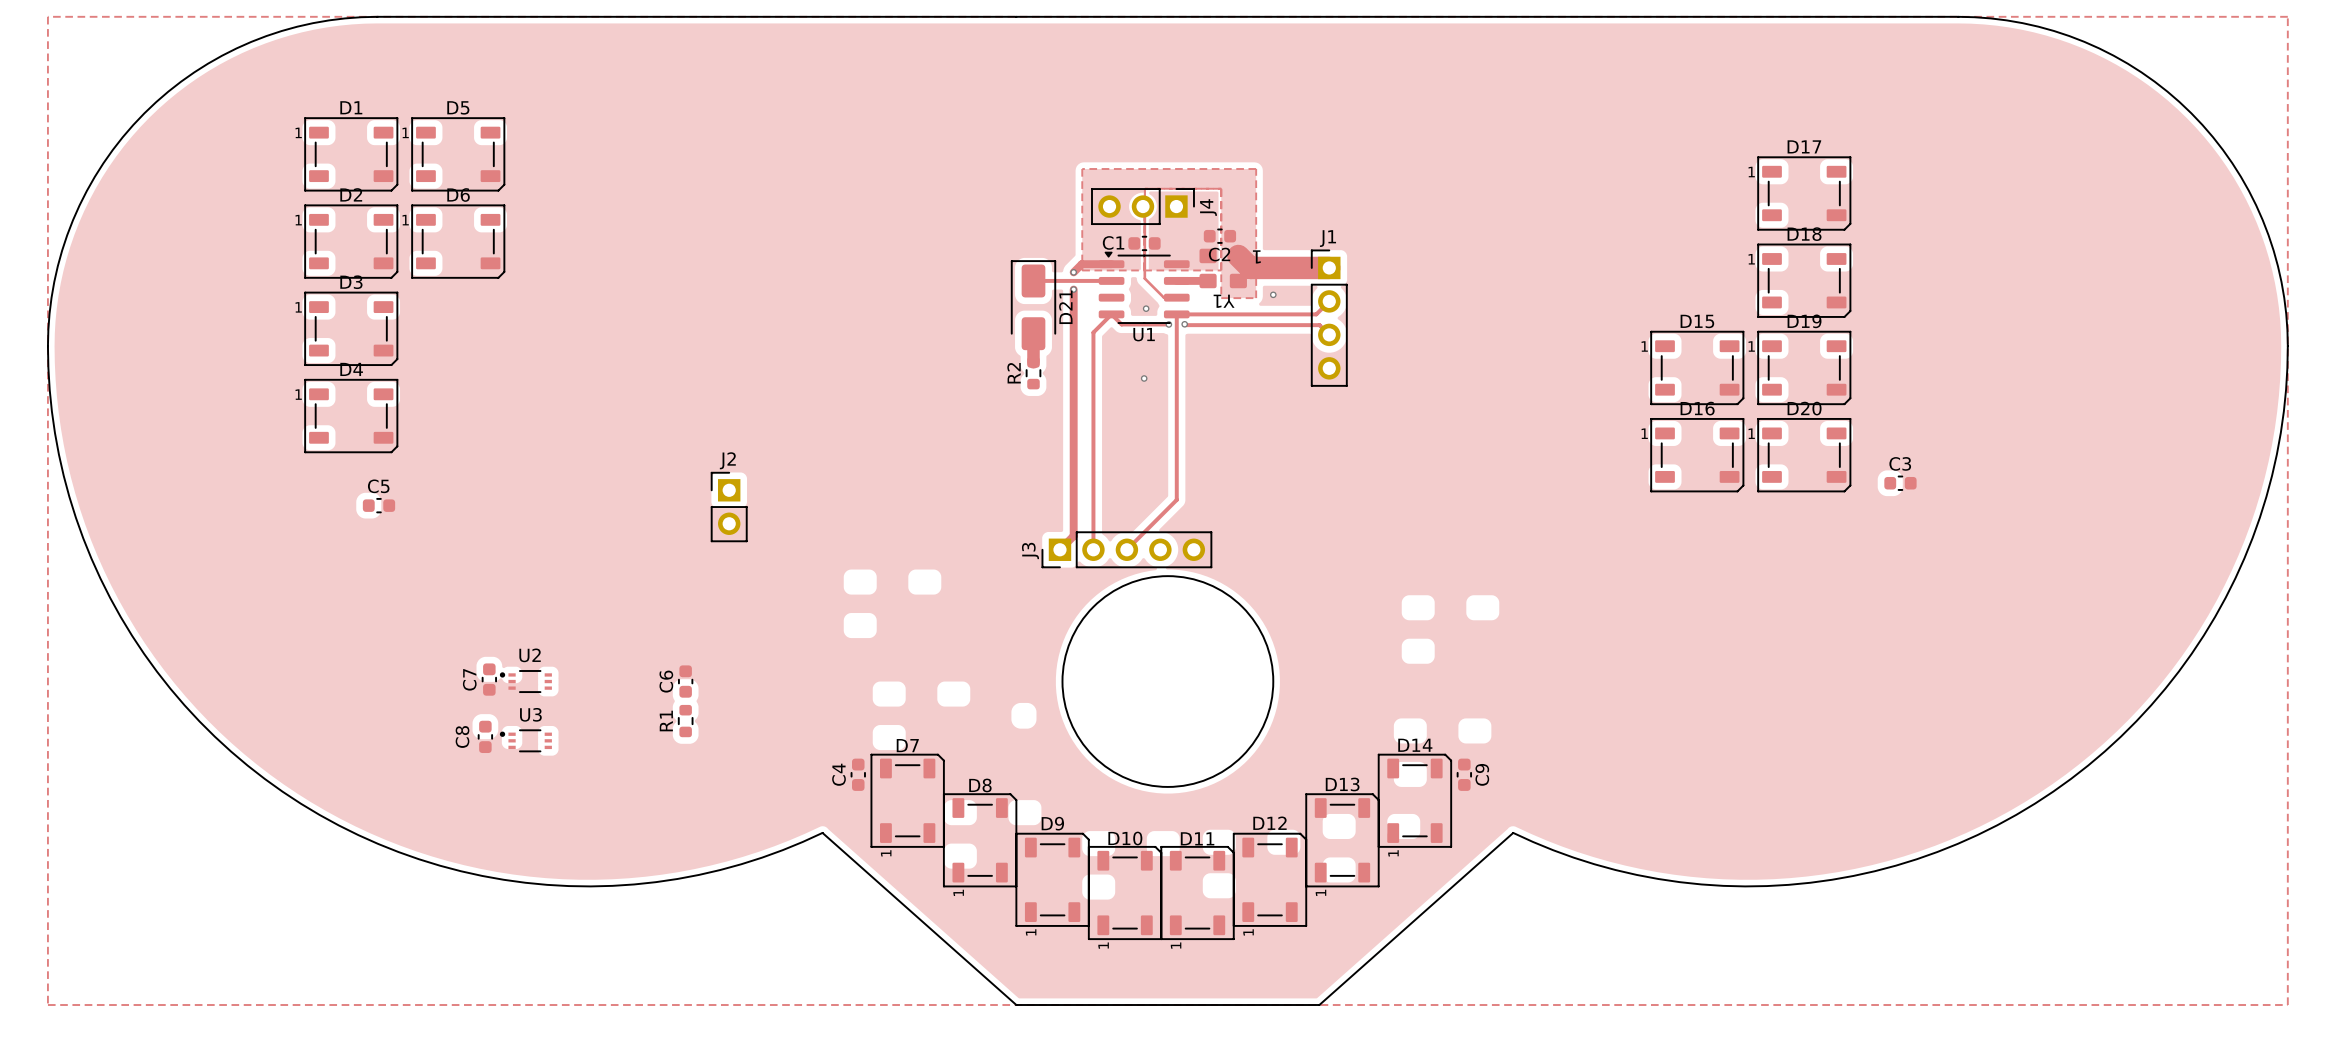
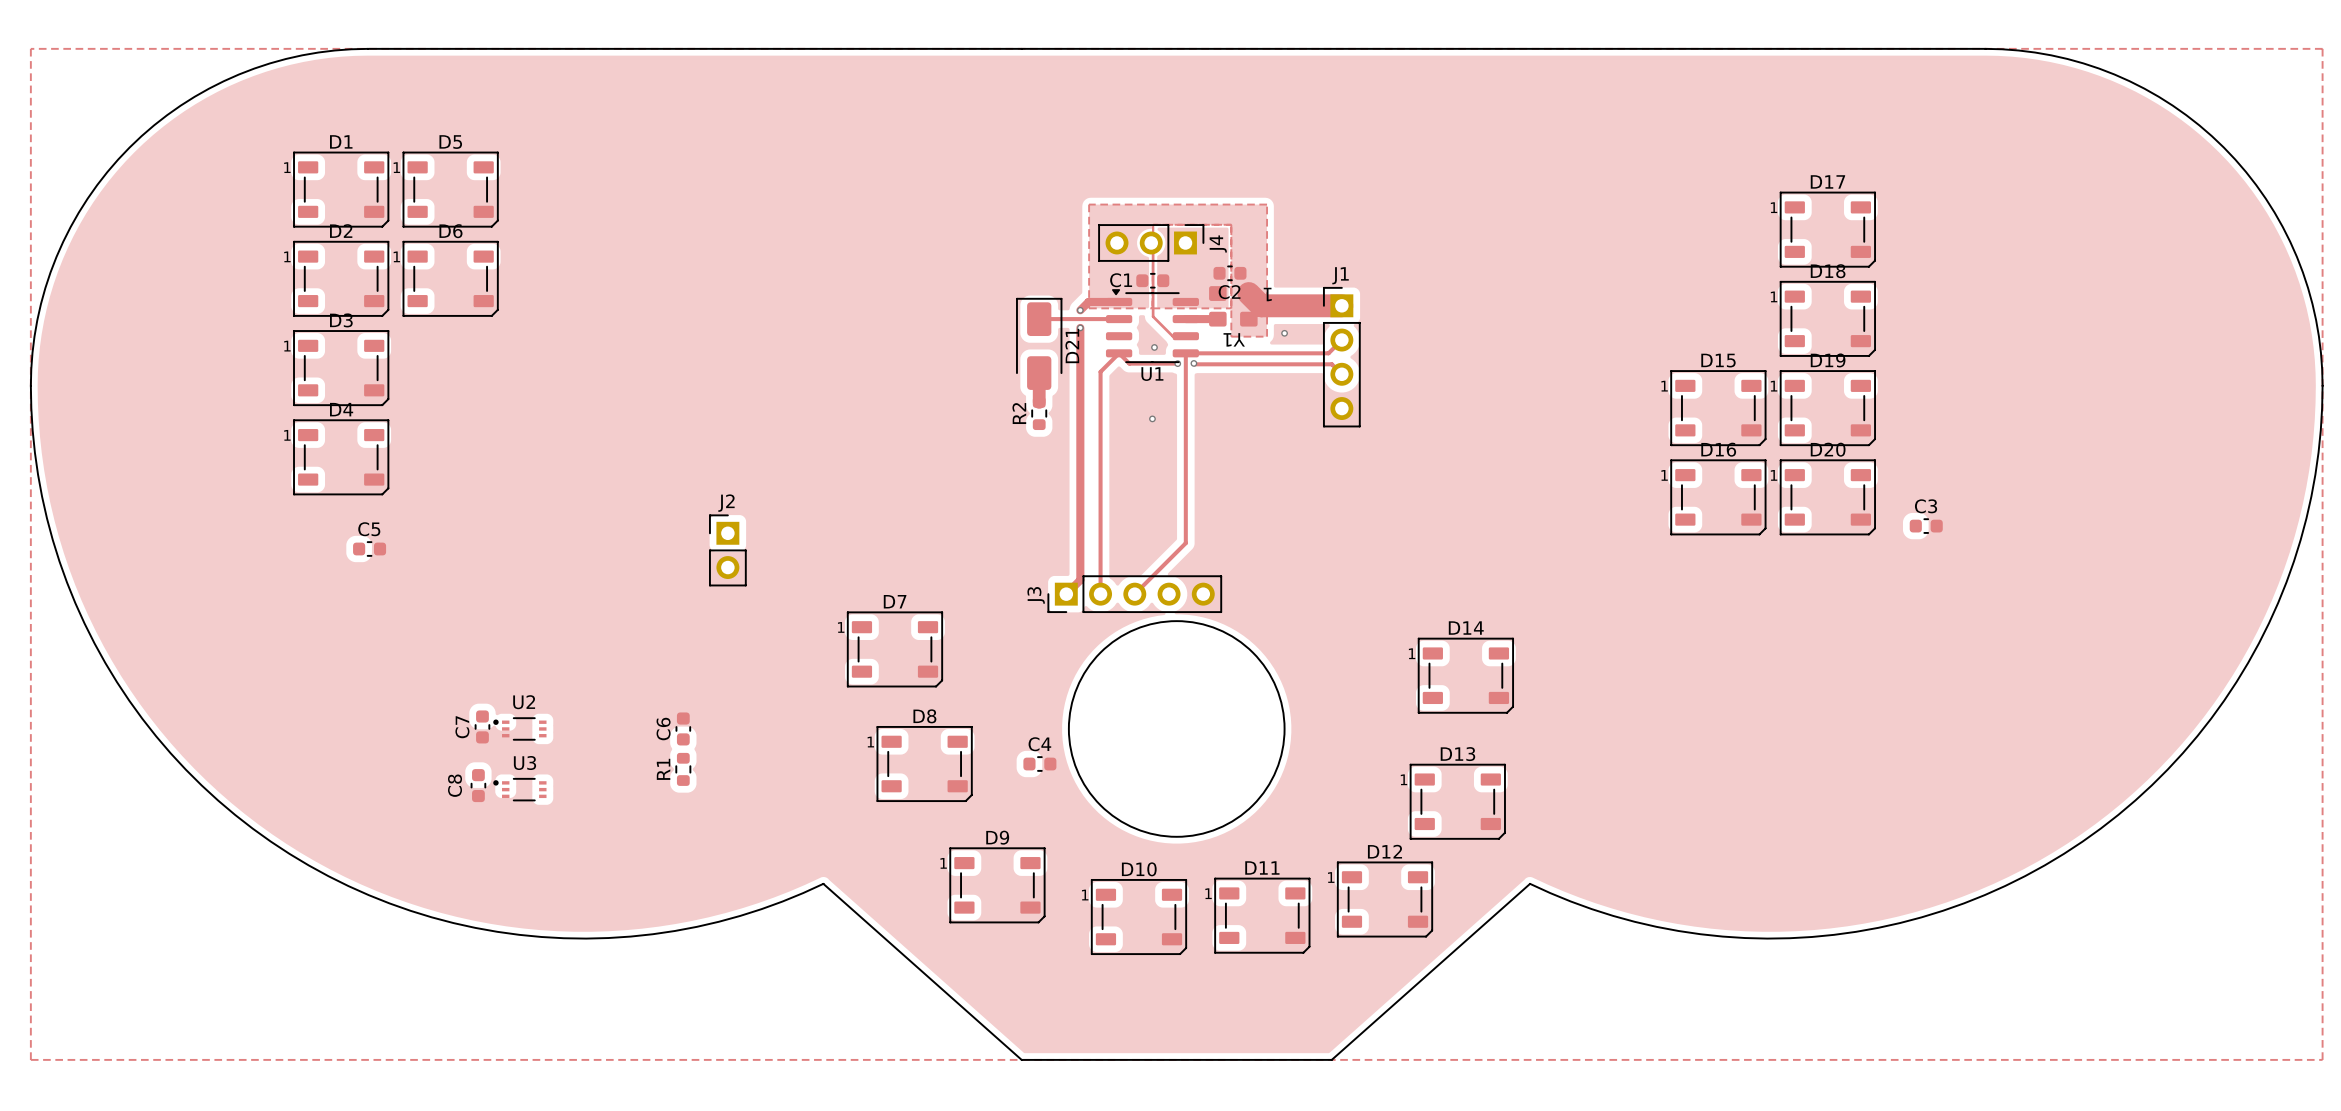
C4 rotation: 0° (858, 774) -> 90° clockwise (1039, 764)
C4 position: (858, 774) -> (1039, 764)
C9: (1464, 774) -> none
D7 rotation: 0° (907, 800) -> 90° clockwise (894, 649)
D7 position: (907, 800) -> (894, 649)
D14 rotation: 0° (1414, 800) -> 90° clockwise (1465, 675)
D14 position: (1414, 800) -> (1465, 675)
D8 rotation: 0° (980, 840) -> 90° clockwise (924, 764)
D8 position: (980, 840) -> (924, 764)
D13 rotation: 0° (1342, 840) -> 90° clockwise (1457, 801)
D13 position: (1342, 840) -> (1457, 801)
D9 rotation: 0° (1052, 879) -> 90° clockwise (997, 885)
D9 position: (1052, 879) -> (997, 885)
D12 rotation: 0° (1270, 879) -> 90° clockwise (1385, 899)
D12 position: (1270, 879) -> (1385, 899)
D10 rotation: 0° (1125, 893) -> 90° clockwise (1138, 917)
D11 rotation: 0° (1197, 893) -> 90° clockwise (1262, 915)
D11 position: (1197, 893) -> (1262, 915)

